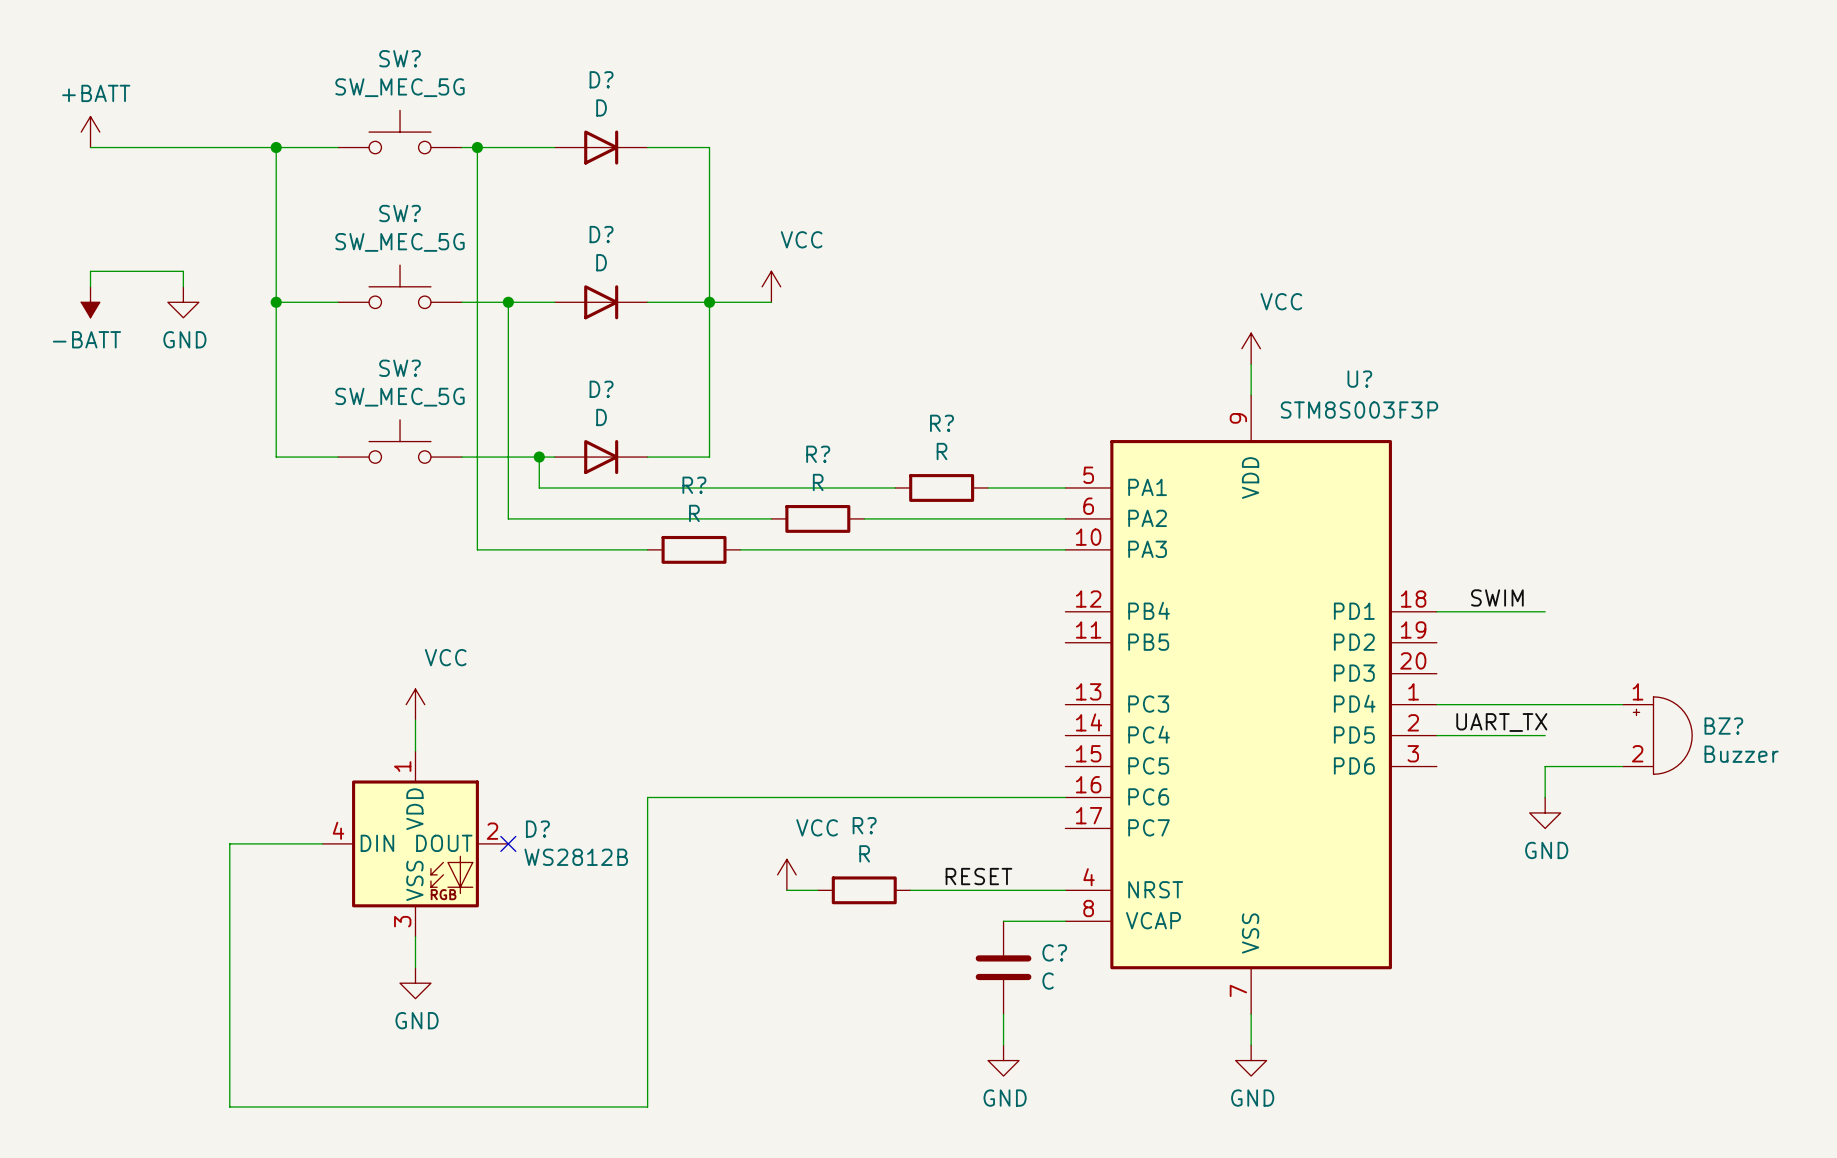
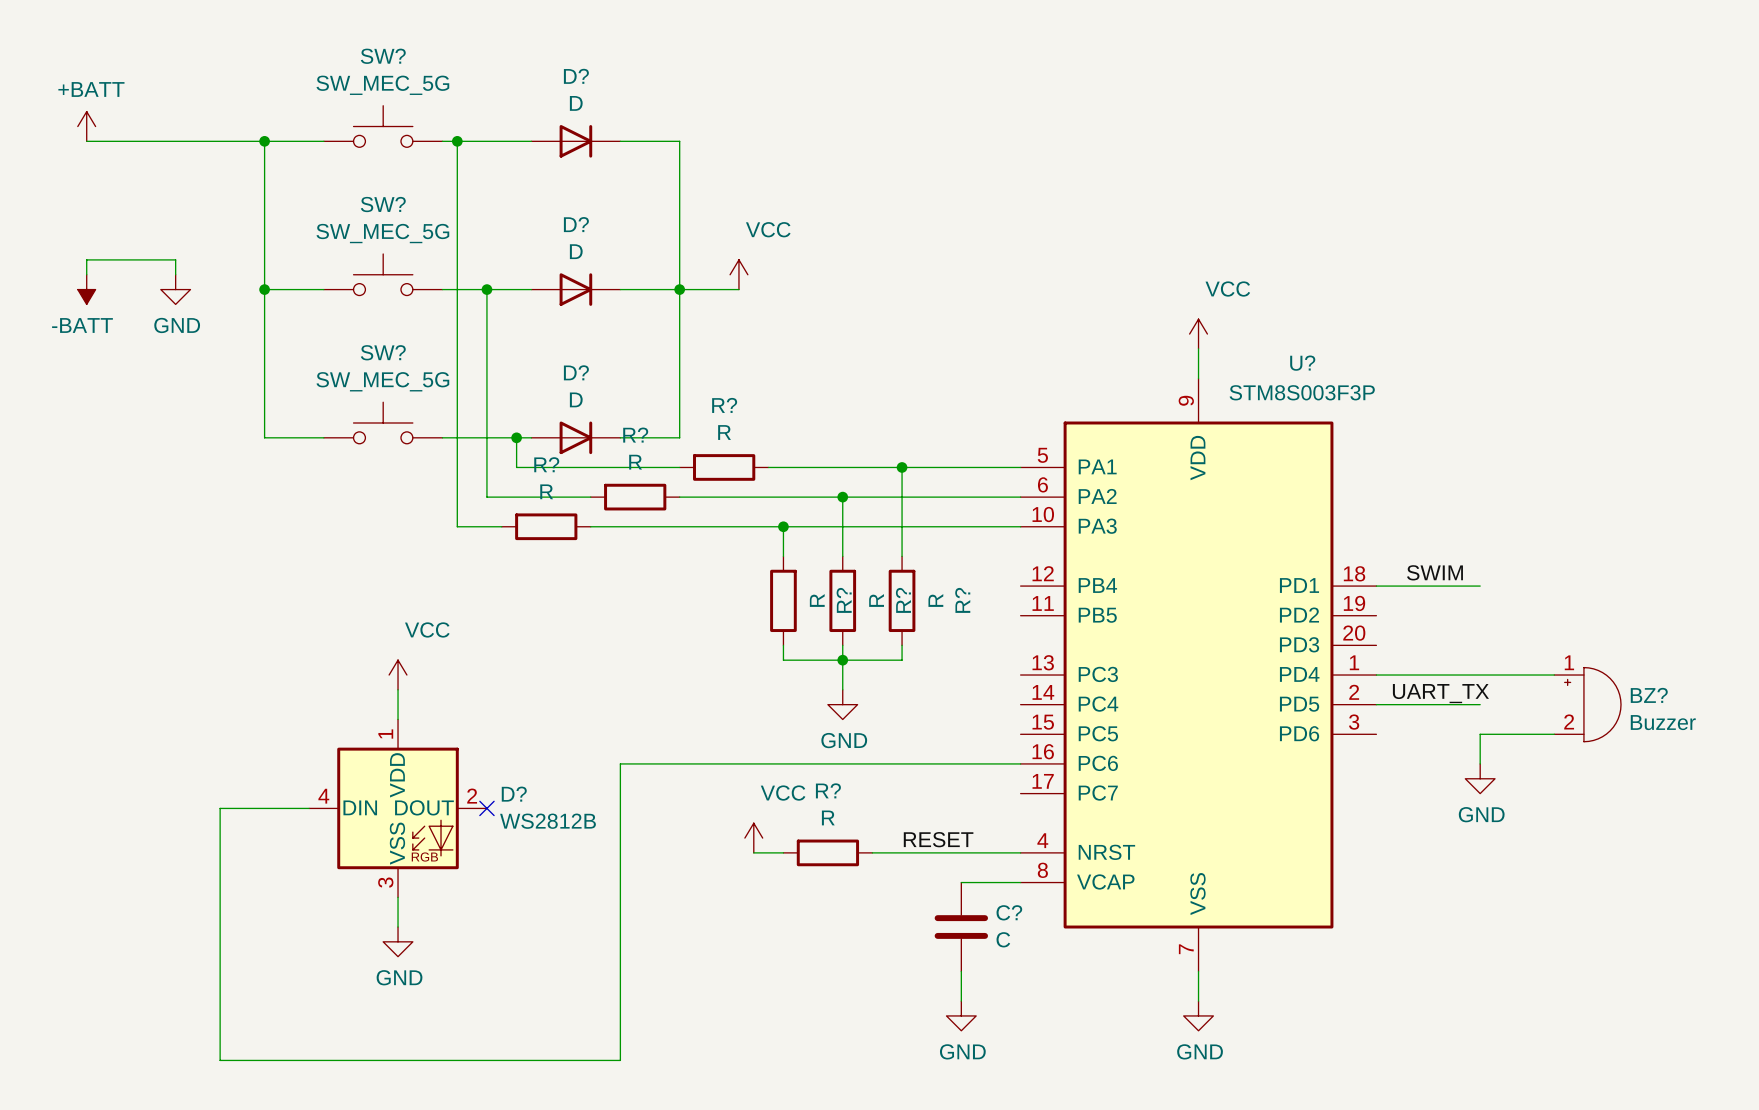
wire: (709, 487) (802, 487) -> (738, 497) (827, 497)
R?: none -> R (724, 467)
wire: none -> (857, 467) (946, 467)
wire: none -> (902, 467) (902, 556)
R?: R (941, 487) -> none
junction: none -> (902, 467)
wire: (616, 518) (709, 518) -> (620, 526) (709, 526)
R?: none -> R (635, 497)
R?: R (817, 518) -> none
wire: none -> (842, 497) (842, 556)
junction: none -> (842, 497)
wire: (523, 549) (616, 549) -> none
R?: none -> R (546, 526)
R?: R (694, 549) -> none
wire: none -> (783, 526) (783, 556)
junction: none -> (783, 526)
R?: none -> R (783, 600)
R?: none -> R (842, 600)
R?: none -> R (902, 600)
wire: none -> (783, 645) (783, 660) (902, 660) (902, 645)
wire: none -> (842, 645) (842, 689)
junction: none -> (842, 660)
power symbol: none -> GND (842, 704)

